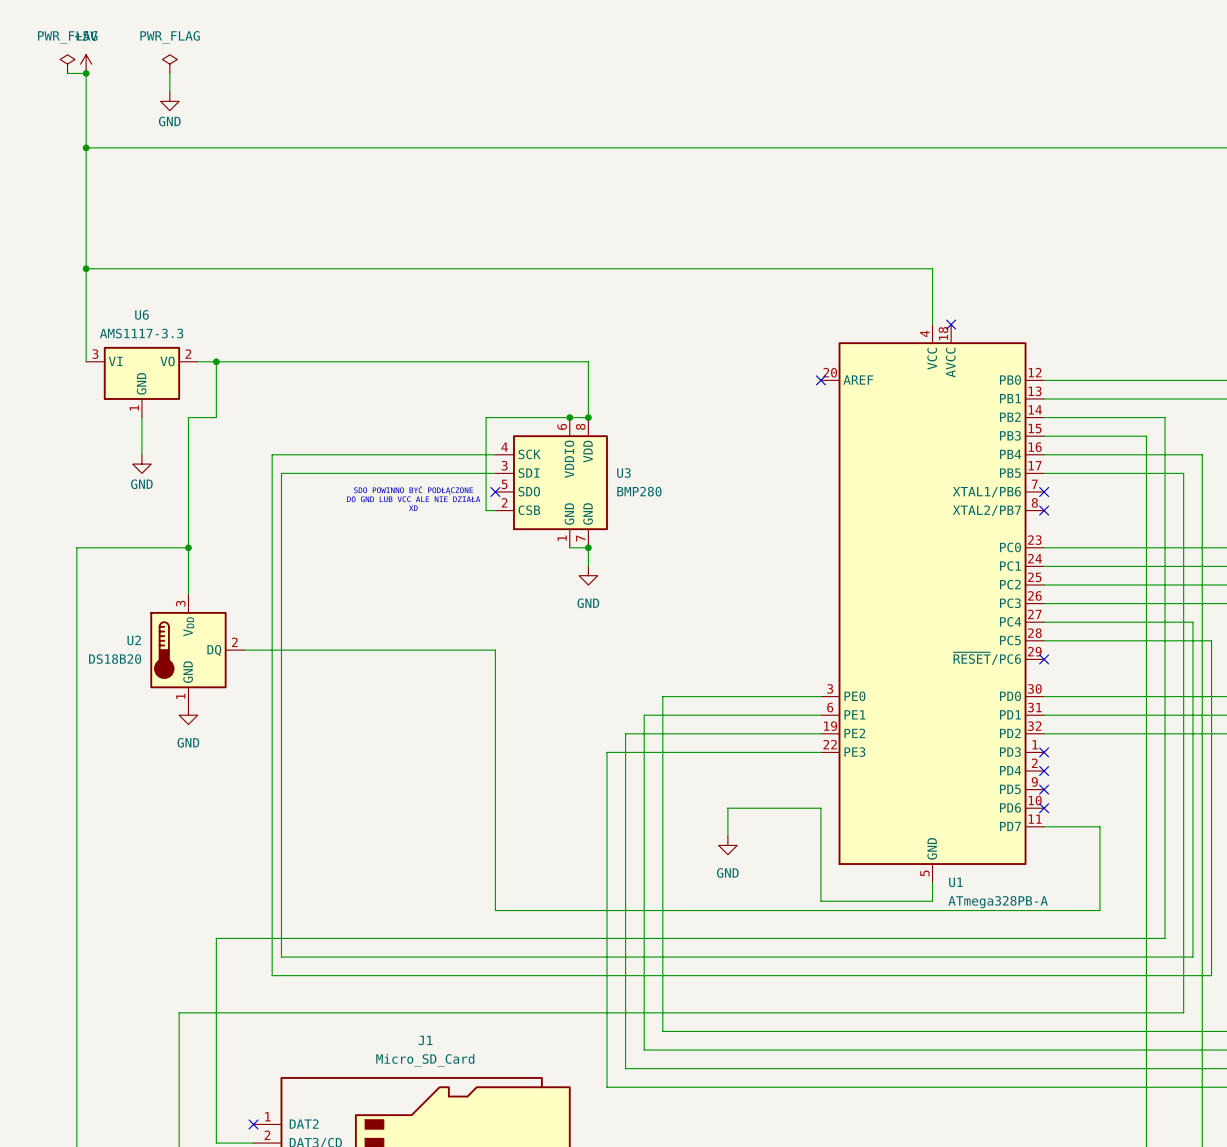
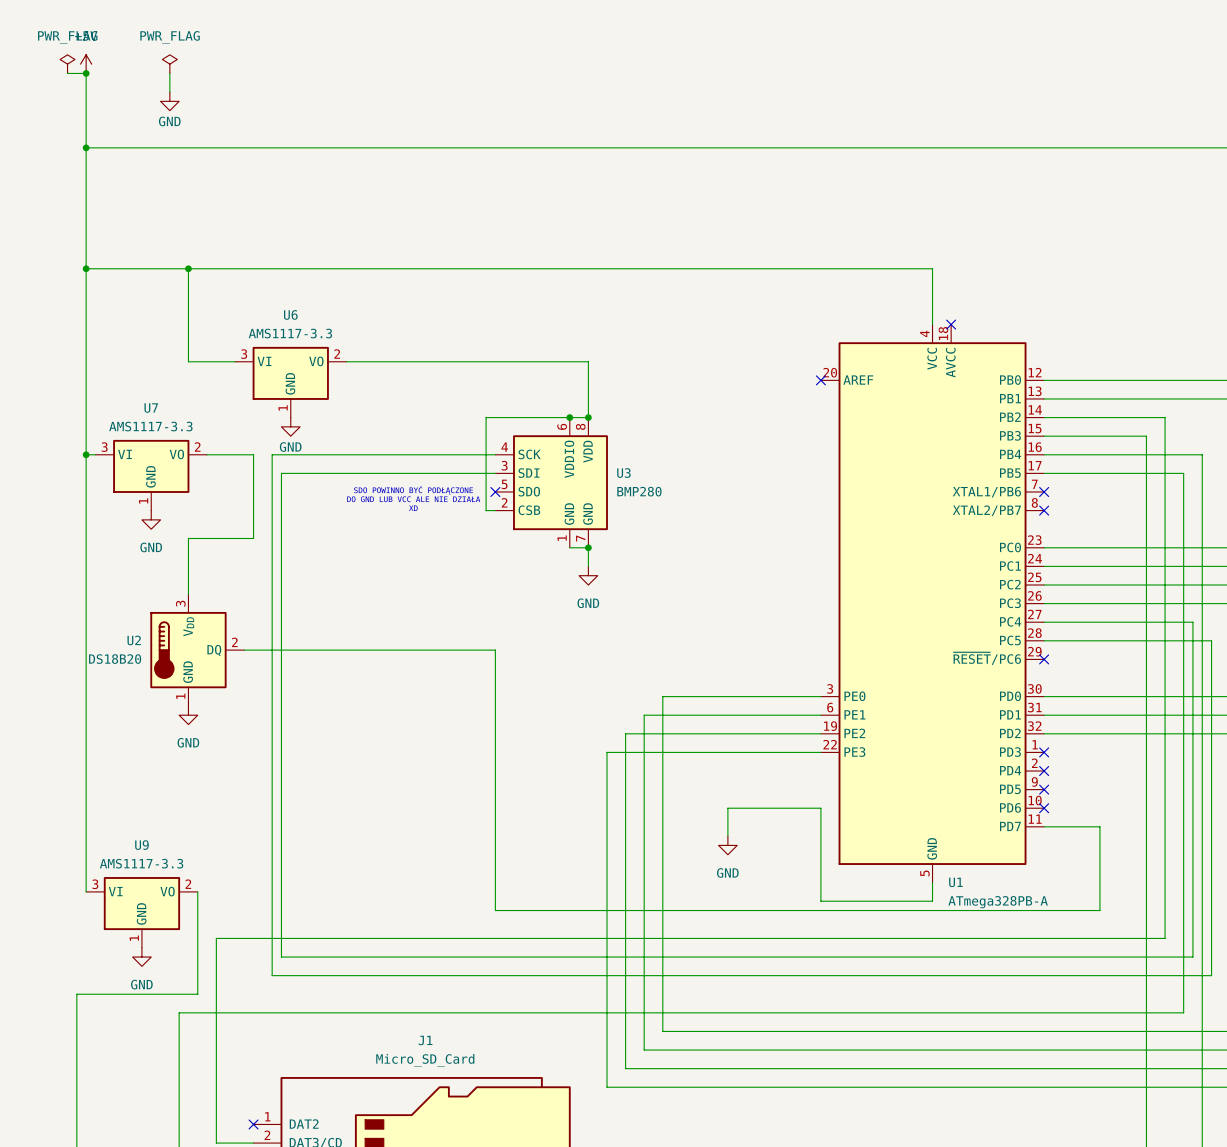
wire: none -> (188, 268) (188, 361) (197, 361)
junction: none -> (188, 268)
wire: none -> (86, 361) (86, 891)
wire: (216, 361) (216, 417) (188, 417) (188, 538) -> (207, 454) (253, 454) (253, 538) (188, 538)
junction: (216, 361) -> none
U6 position: (141, 382) -> (290, 382)
wire: (141, 417) (141, 454) -> none
power symbol: none -> GND (290, 426)
wire: none -> (86, 454) (95, 454)
junction: none -> (86, 454)
power symbol position: GND (141, 464) -> GND (151, 519)
U7: none -> AMS1117-3.3 (151, 475)
power symbol text position: GND (141, 484) -> GND (151, 547)
wire: (188, 547) (76, 547) (76, 994) -> (197, 891) (197, 994) (76, 994)
junction: (188, 547) -> none
U9: none -> AMS1117-3.3 (141, 912)
power symbol: none -> GND (141, 957)

